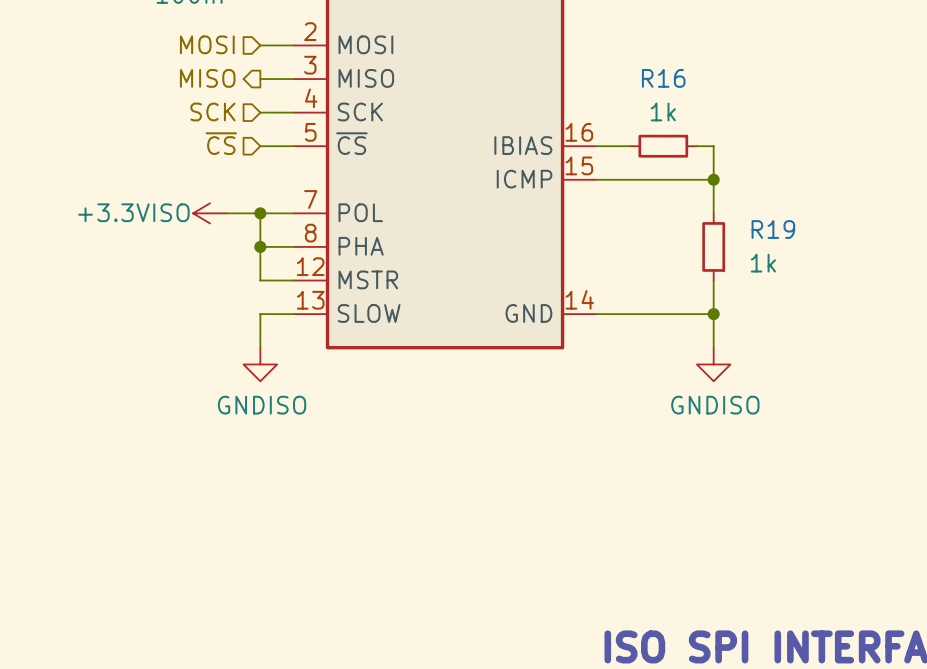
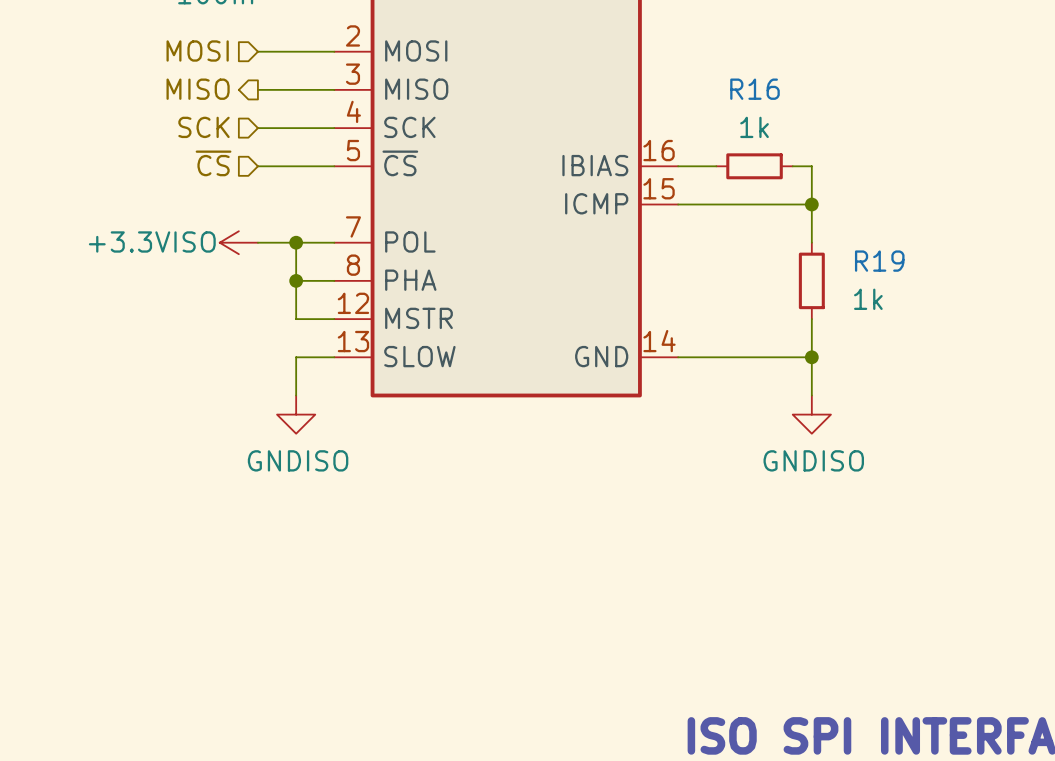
hierarchical label position: MOSI (207, 44) -> MOSI (197, 50)
wire: none -> (257, 51) (296, 51)
hierarchical label position: MISO (207, 78) -> MISO (198, 89)
wire: none -> (257, 89) (296, 89)
hierarchical label position: SCK (212, 111) -> SCK (204, 127)
wire: none -> (257, 128) (296, 128)
hierarchical label position: ~{CS} (221, 143) -> ~{CS} (213, 163)
wire: none -> (257, 166) (296, 166)

